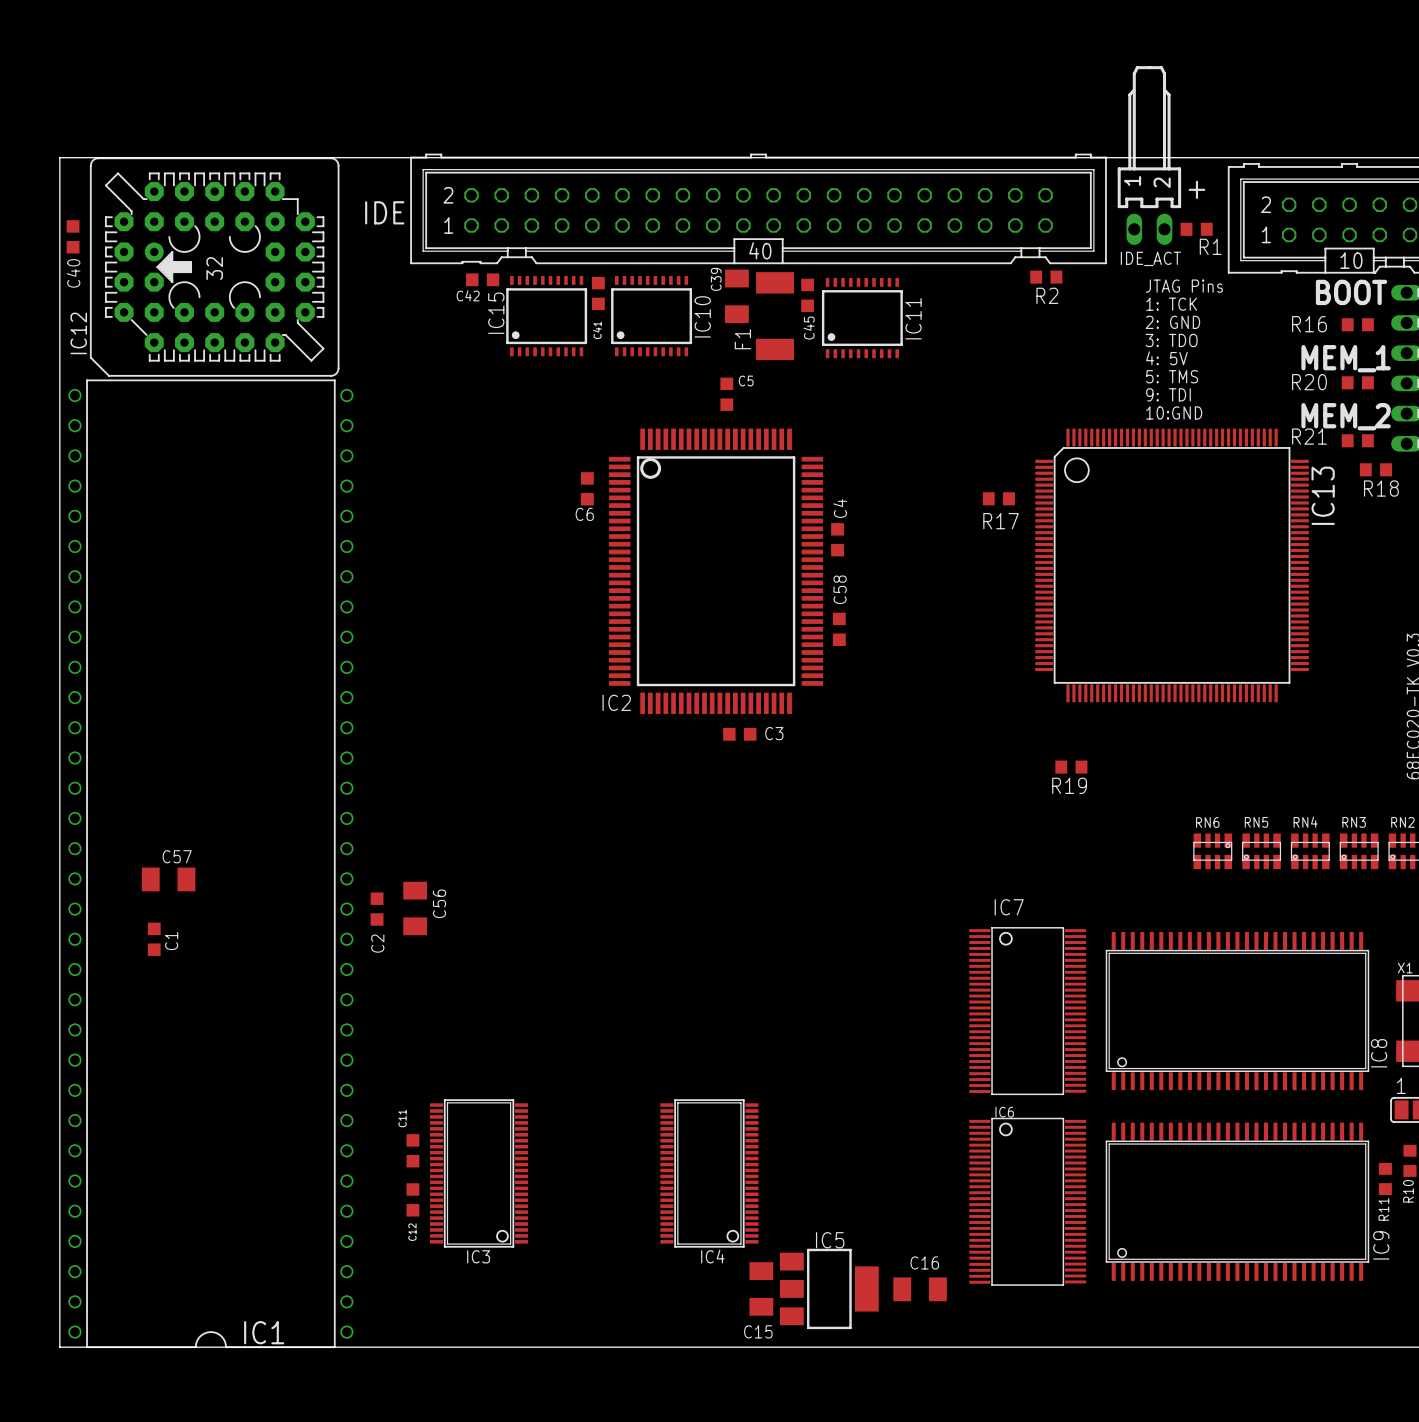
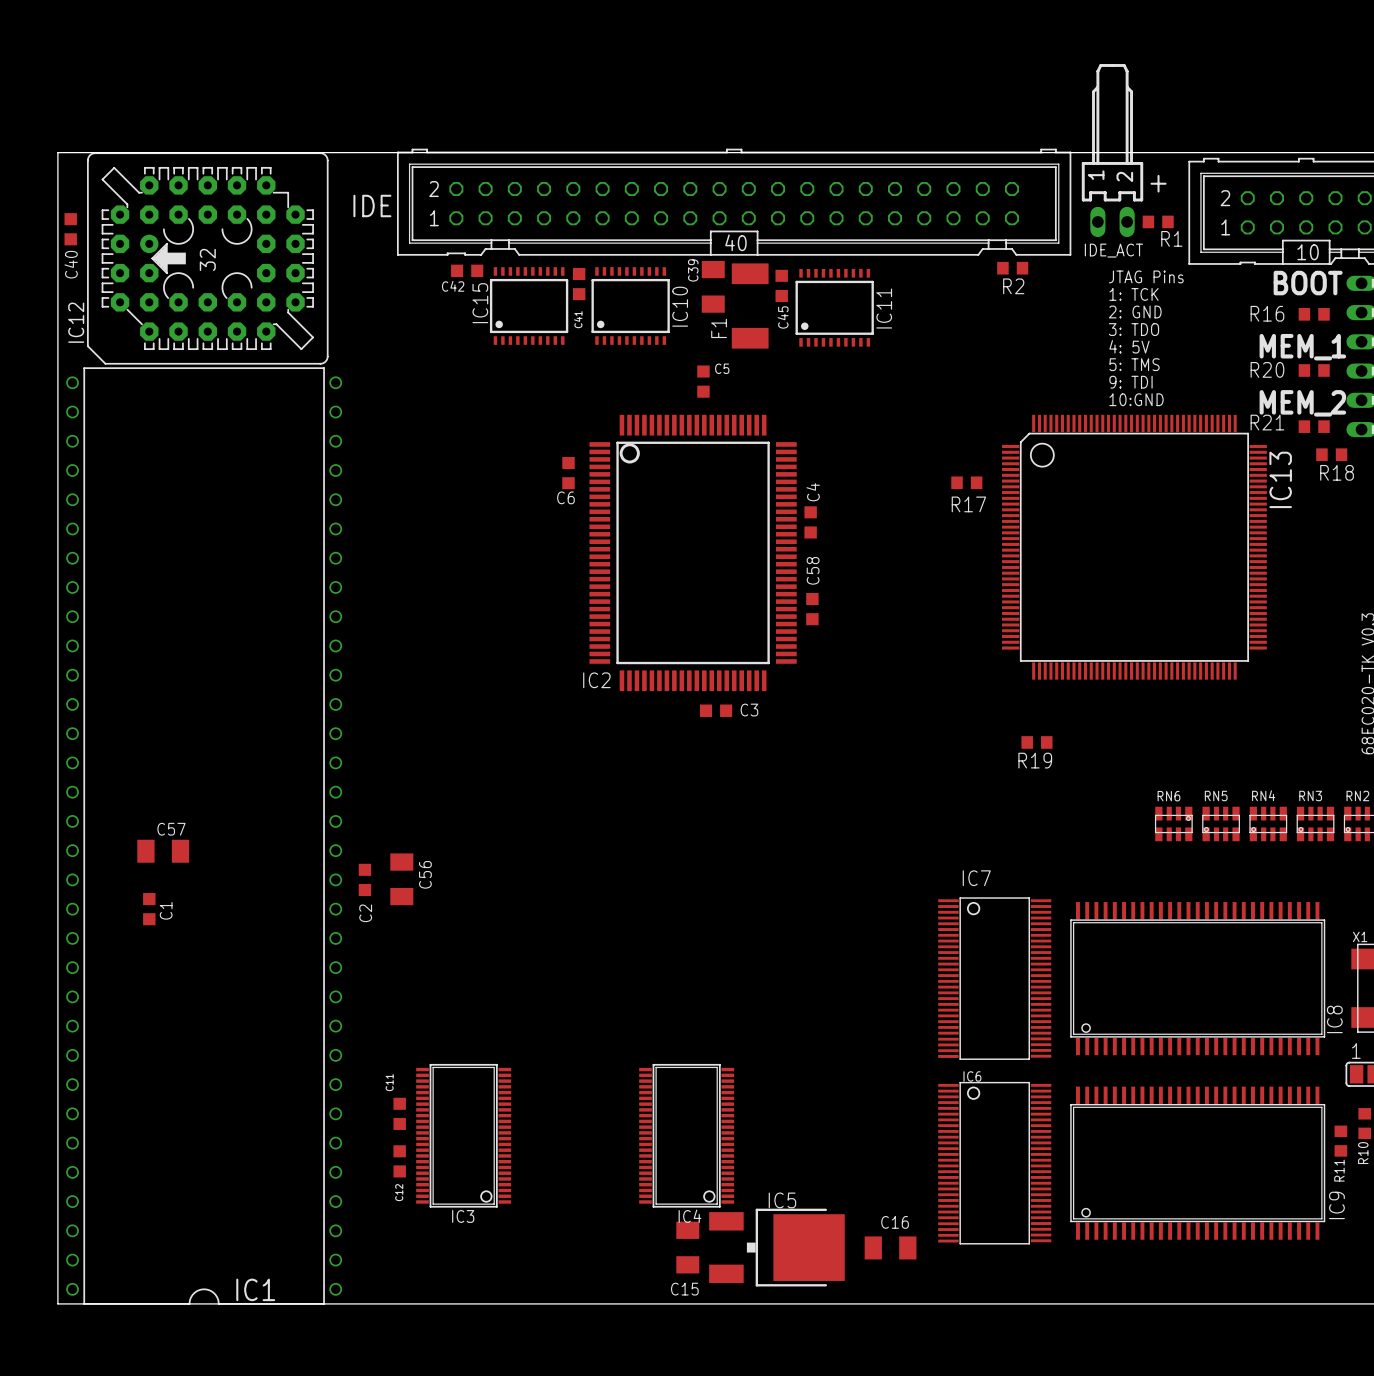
IC5 footprint: [780, 1248, 879, 1330] -> [709, 1208, 845, 1287]
C15 position: (761, 1288) -> (687, 1247)

